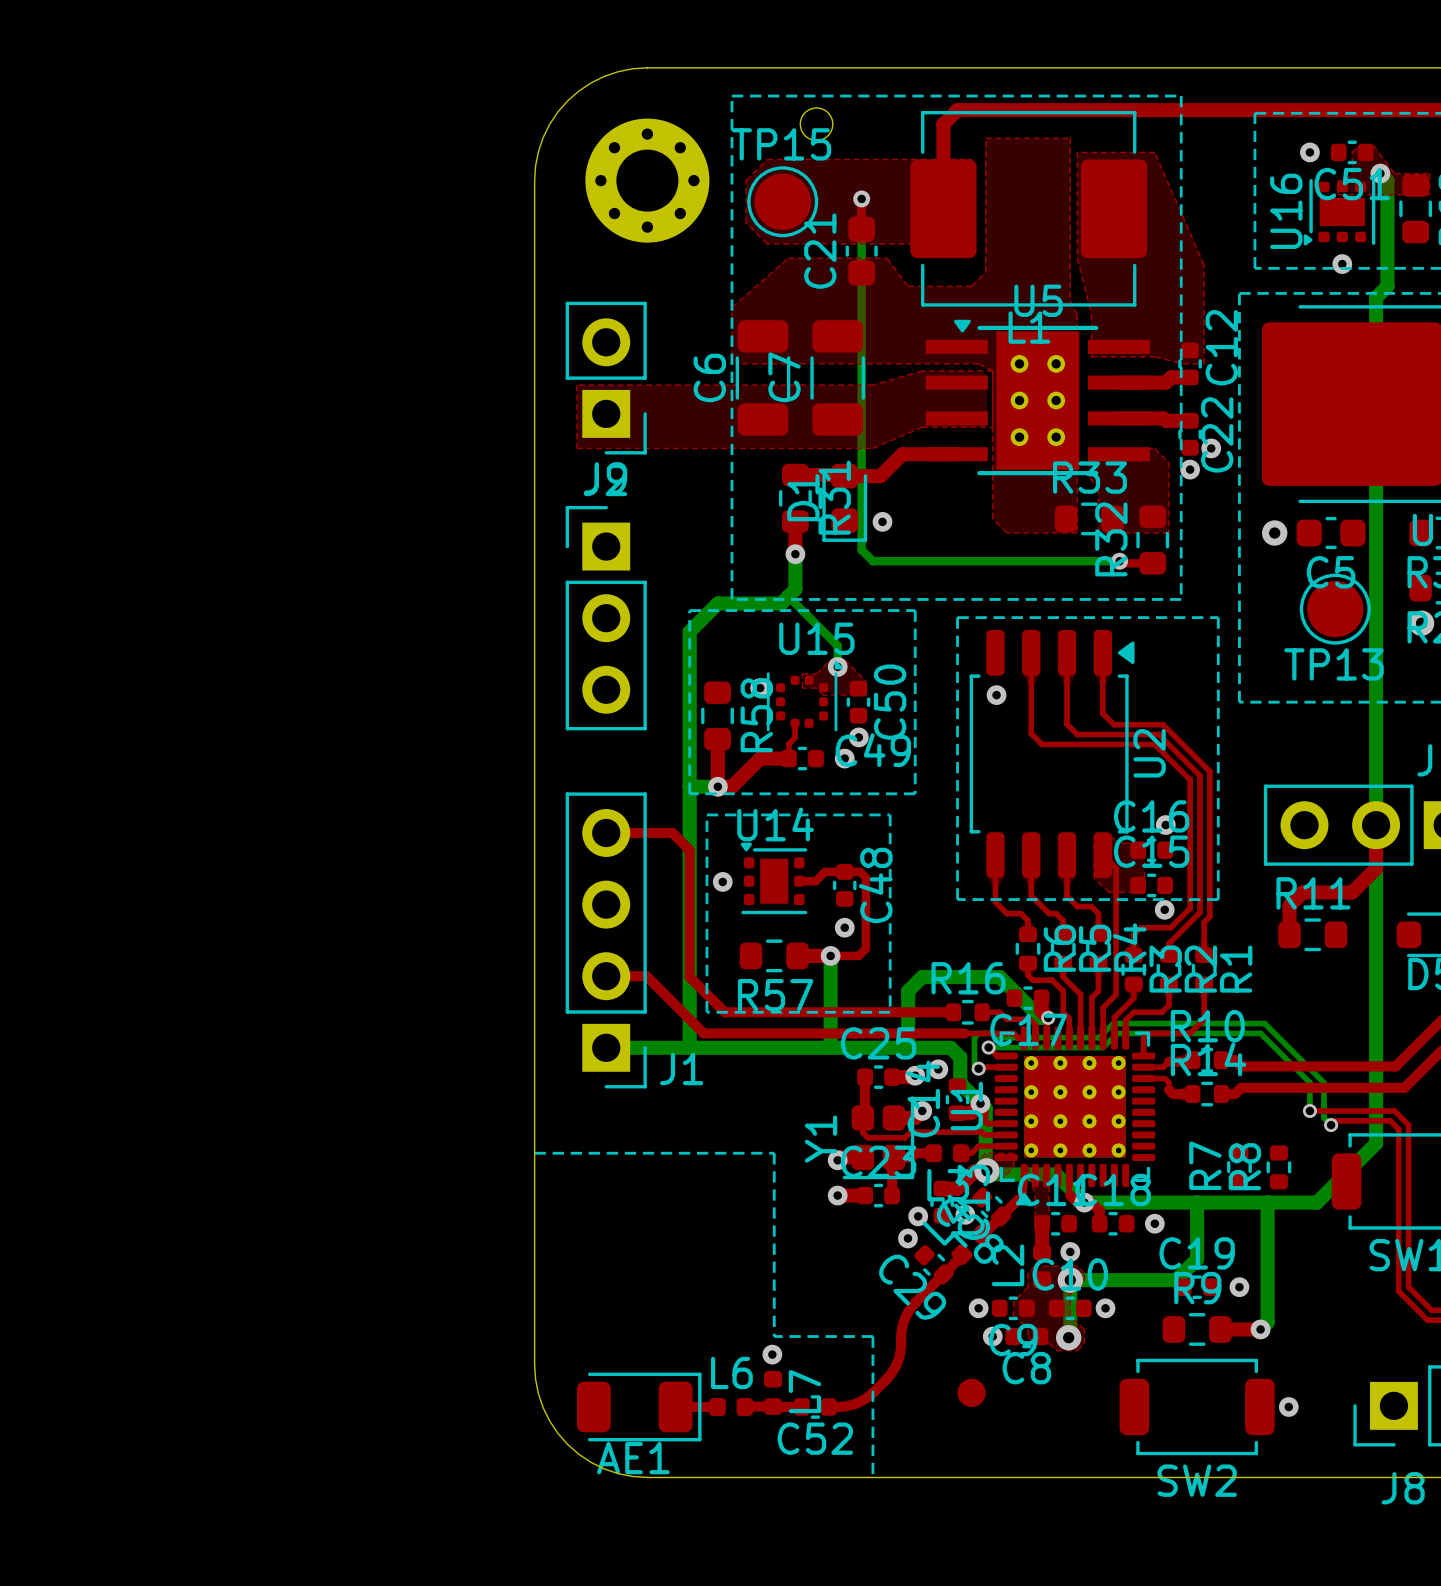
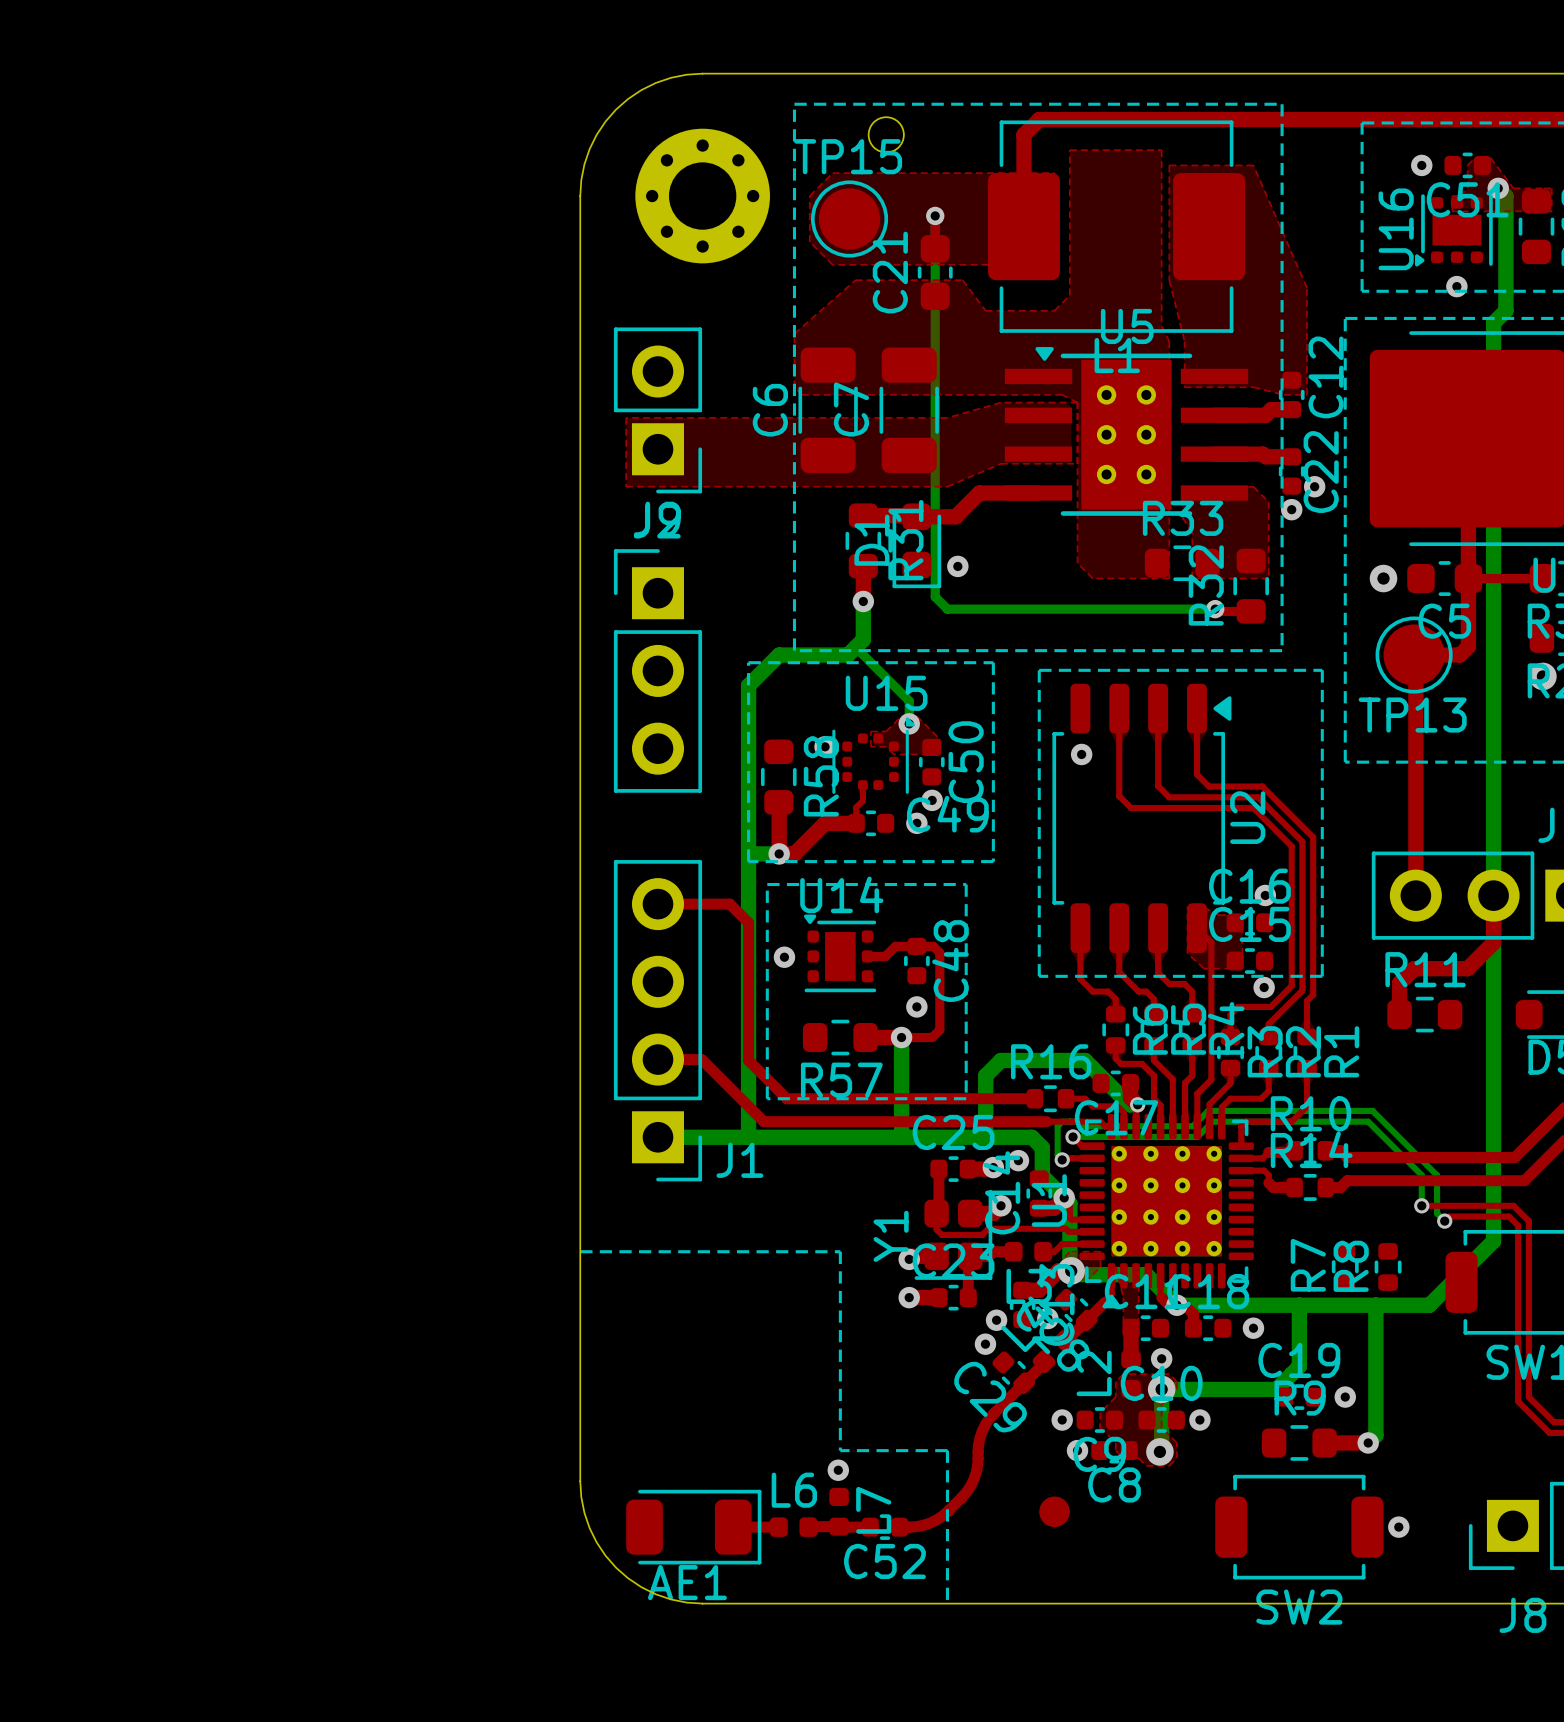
top track: none -> (1467, 438) (1468, 646) (1460, 655) (1414, 655) (1414, 670) (1415, 672) (1415, 895)
top track: none -> (1468, 578) (1541, 578)
TP13 position: (1335, 609) -> (1414, 655)

